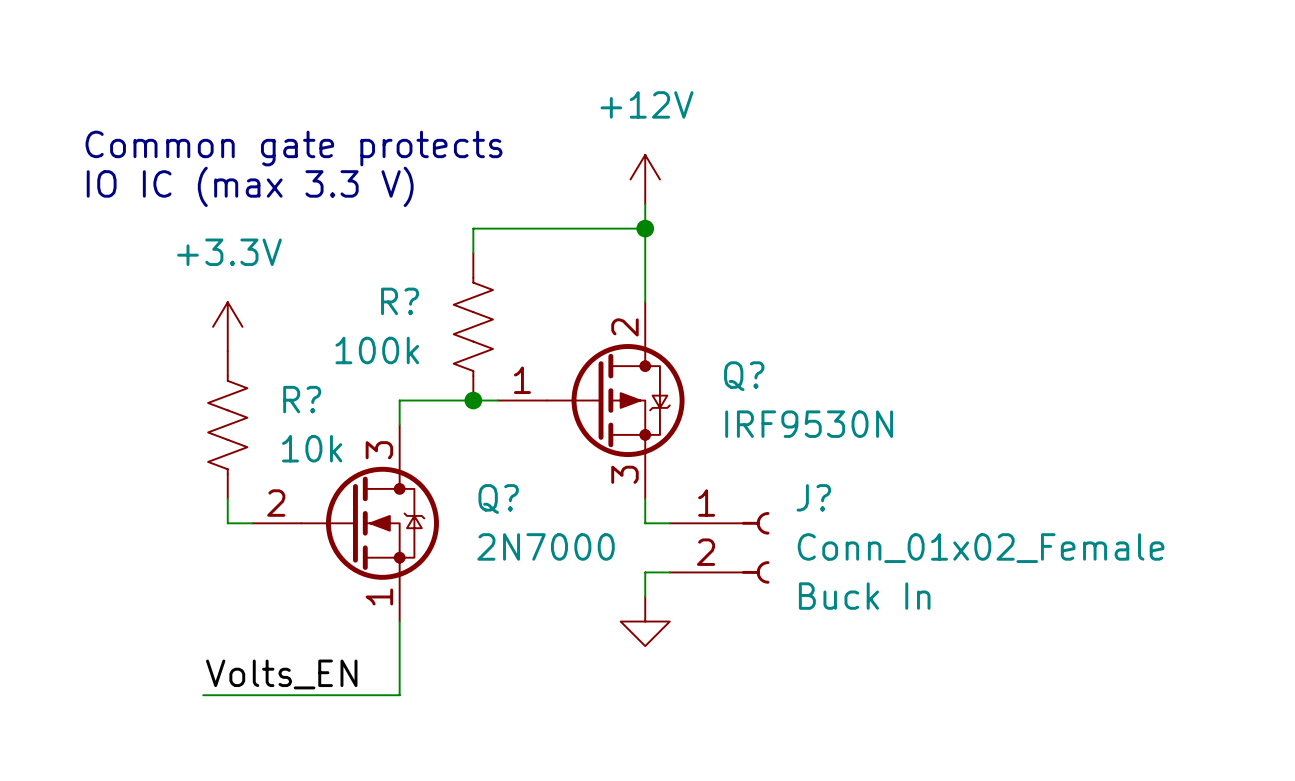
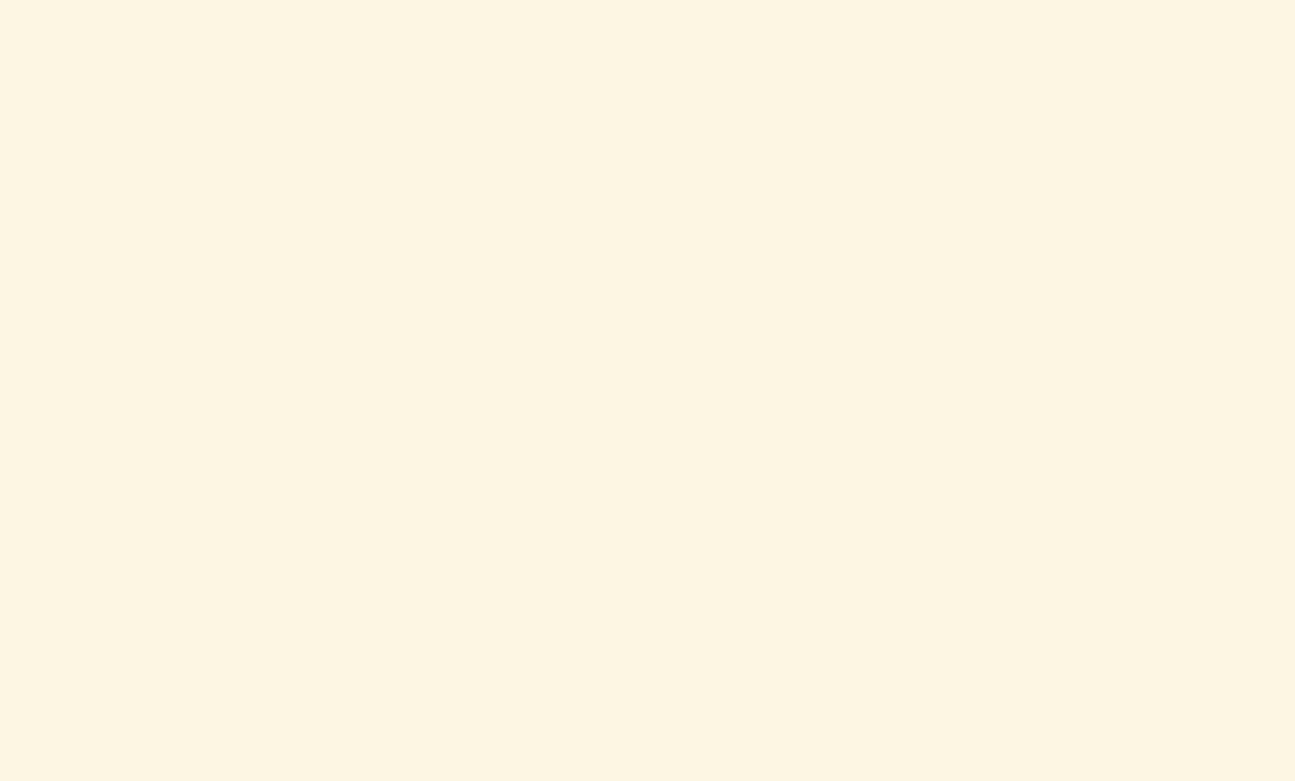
text: Common gate protects (294, 148) -> none
power symbol: +12V (645, 179) -> none
text: IO IC (max 3.3 V) (250, 186) -> none
wire: (645, 204) (645, 302) -> none
wire: (645, 228) (473, 228) (473, 253) -> none
junction: (645, 228) -> none
power symbol: +3.3V (227, 326) -> none
R?: 100k (473, 326) -> none
junction: (473, 400) -> none
wire: (497, 400) (399, 400) (399, 425) -> none
Q?: IRF9530N (591, 400) -> none
R?: 10k (227, 425) -> none
wire: (227, 498) (227, 523) (252, 523) -> none
wire: (645, 498) (645, 523) (669, 523) -> none
Q?: 2N7000 (345, 523) -> none
J?: Conn_01x02_Female (719, 547) -> none
wire: (669, 572) (645, 572) (645, 596) -> none
wire: (399, 621) (399, 695) (203, 695) -> none
power symbol: (645, 621) -> none
label: Volts_EN (281, 674) -> none

